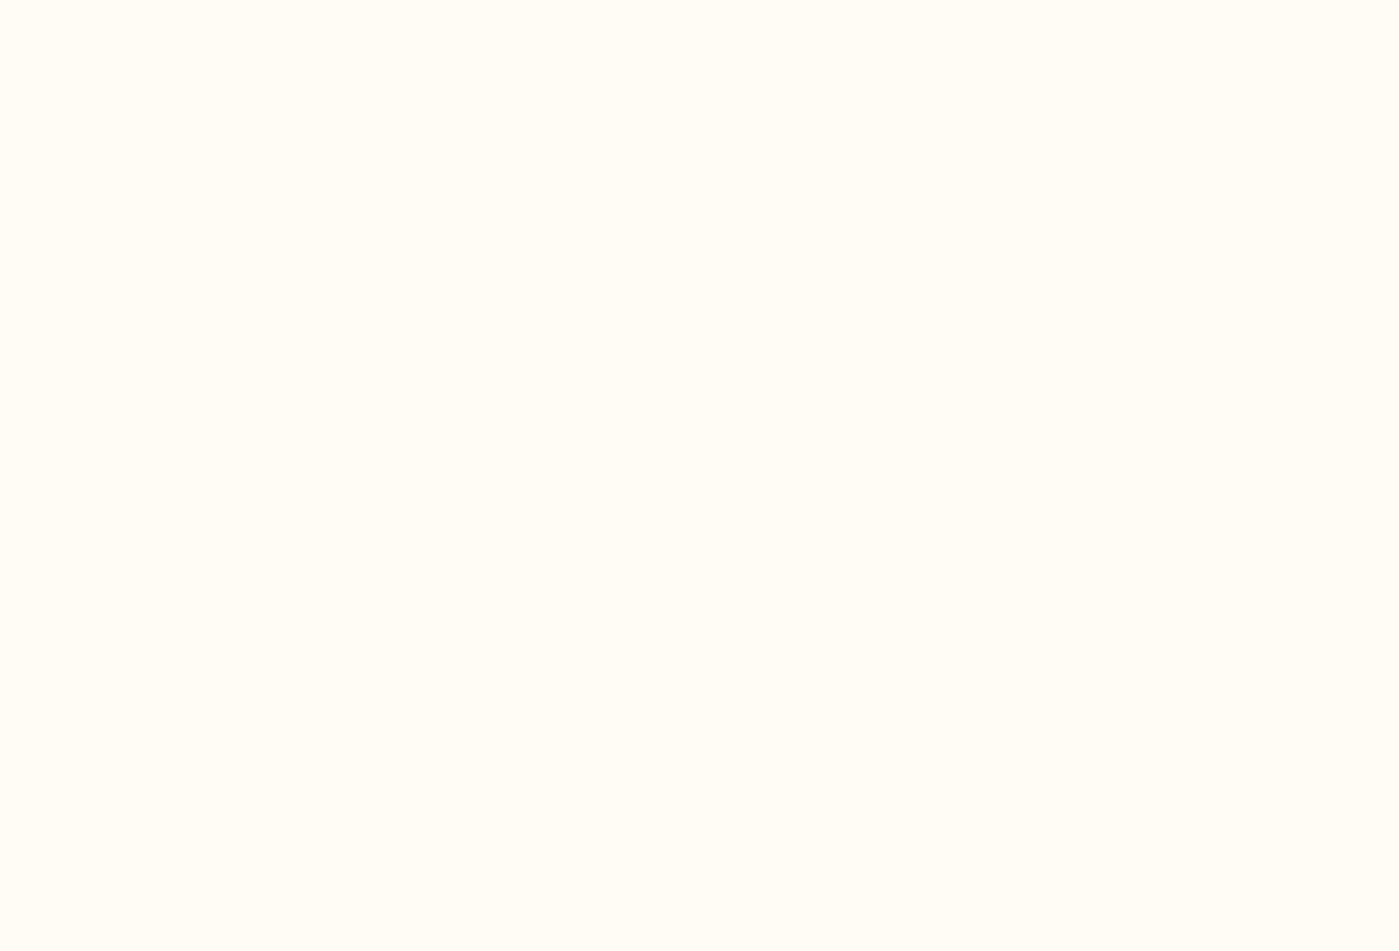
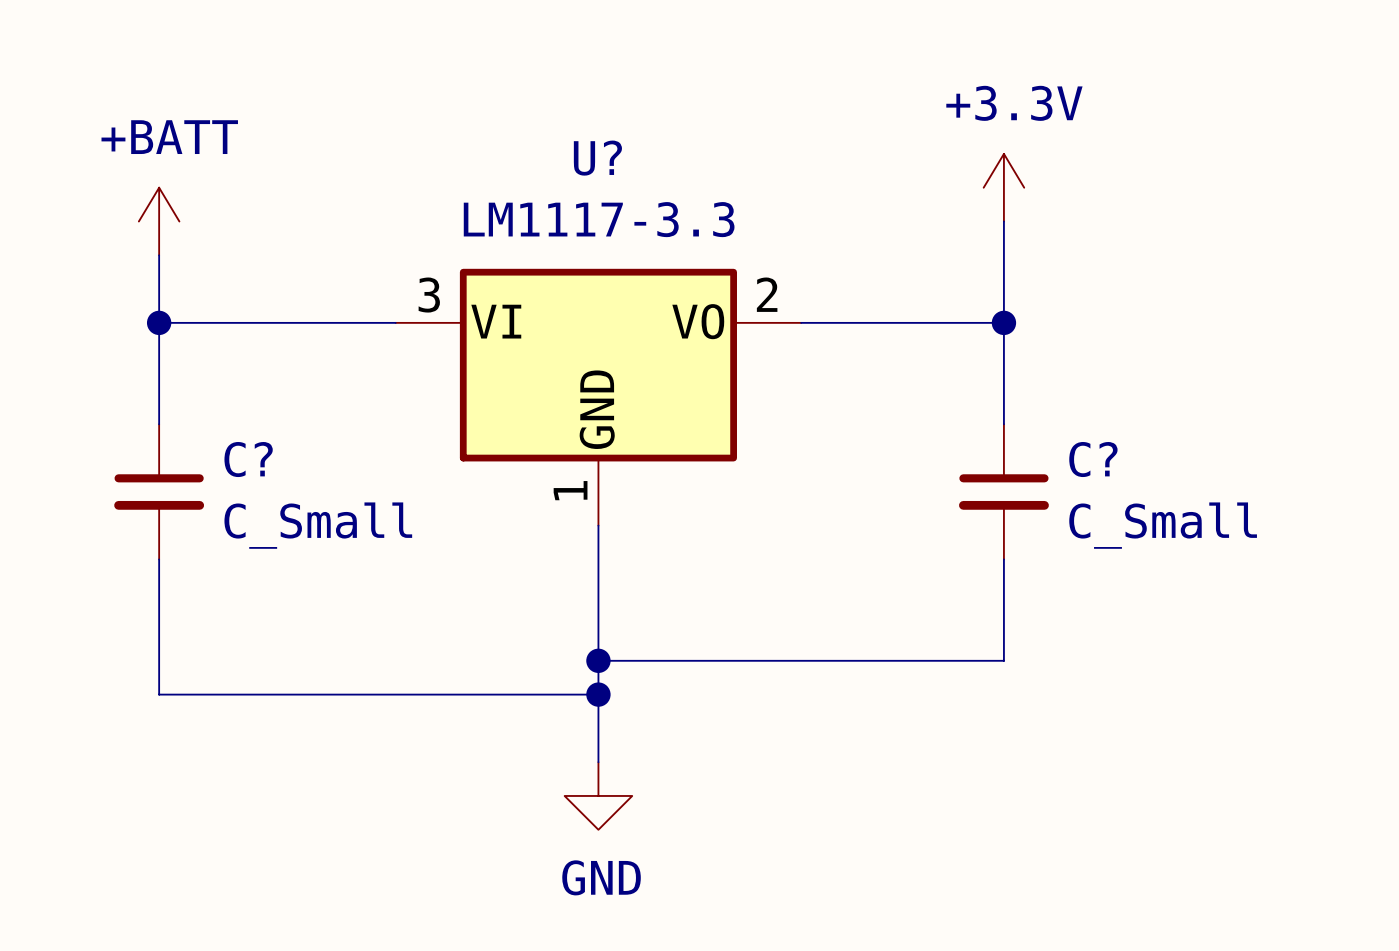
power symbol: none -> +3.3V (1003, 187)
power symbol: none -> +BATT (159, 221)
wire: none -> (1003, 221) (1003, 424)
wire: none -> (159, 255) (159, 424)
wire: none -> (159, 322) (395, 322)
junction: none -> (159, 322)
wire: none -> (801, 322) (1003, 322)
junction: none -> (1003, 322)
U?: none -> LM1117-3.3 (598, 397)
C?: none -> C_Small (159, 491)
C?: none -> C_Small (1003, 491)
wire: none -> (598, 525) (598, 762)
wire: none -> (159, 559) (159, 694) (598, 694)
wire: none -> (1003, 559) (1003, 660) (598, 660)
junction: none -> (598, 660)
junction: none -> (598, 694)
power symbol: none -> GND (598, 795)

